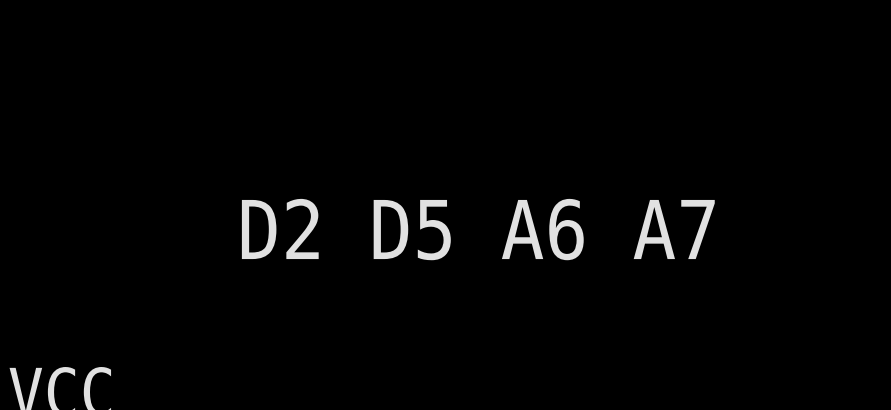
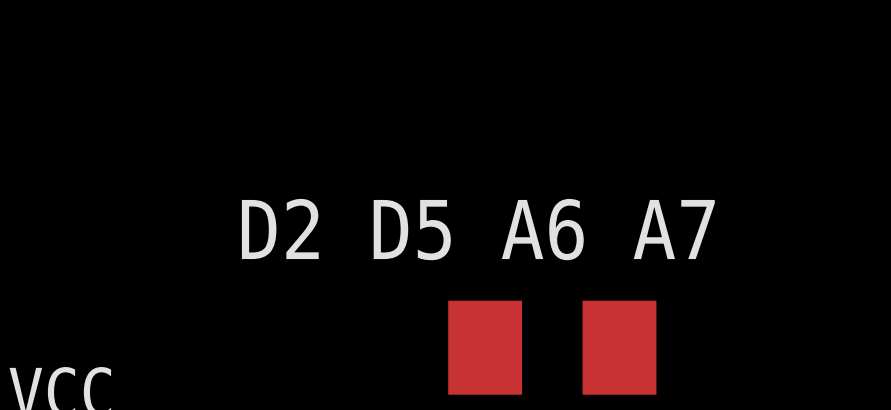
part: none -> (552, 347)

